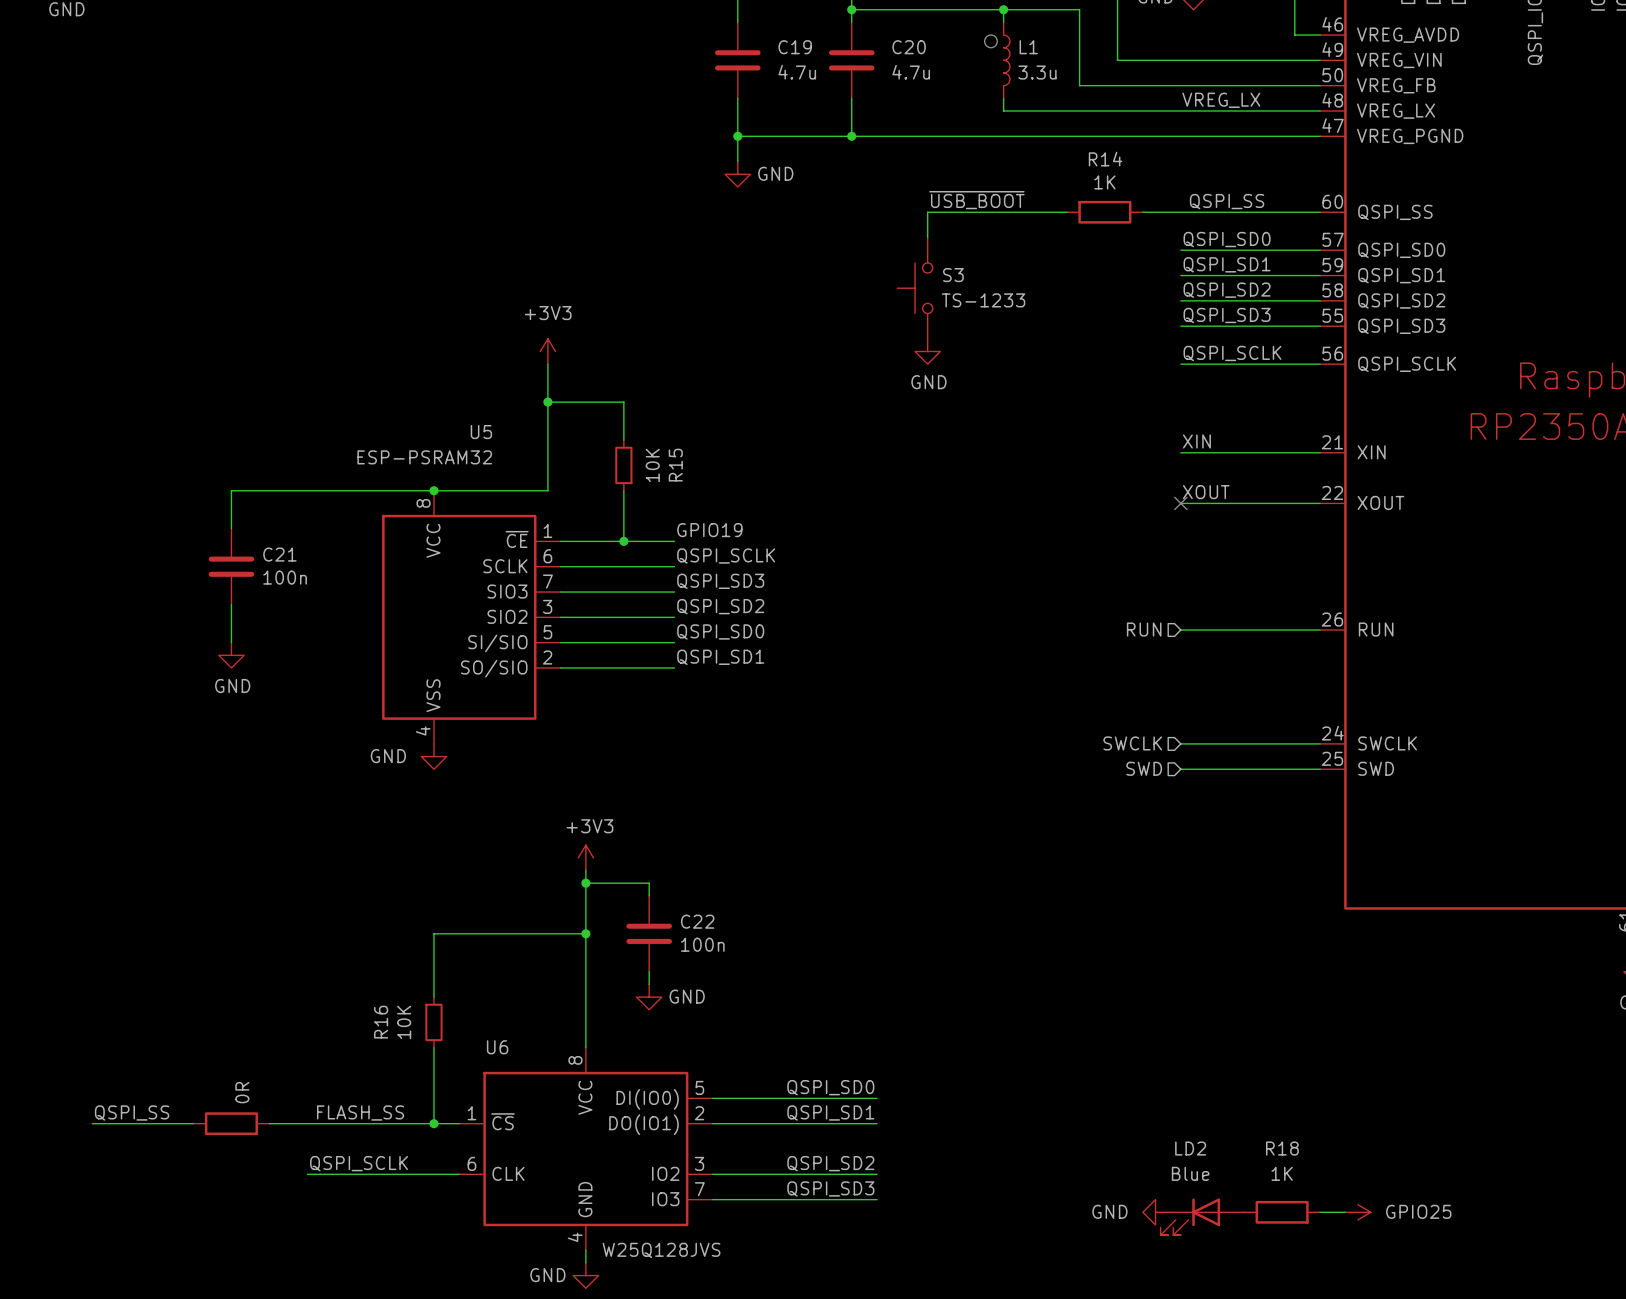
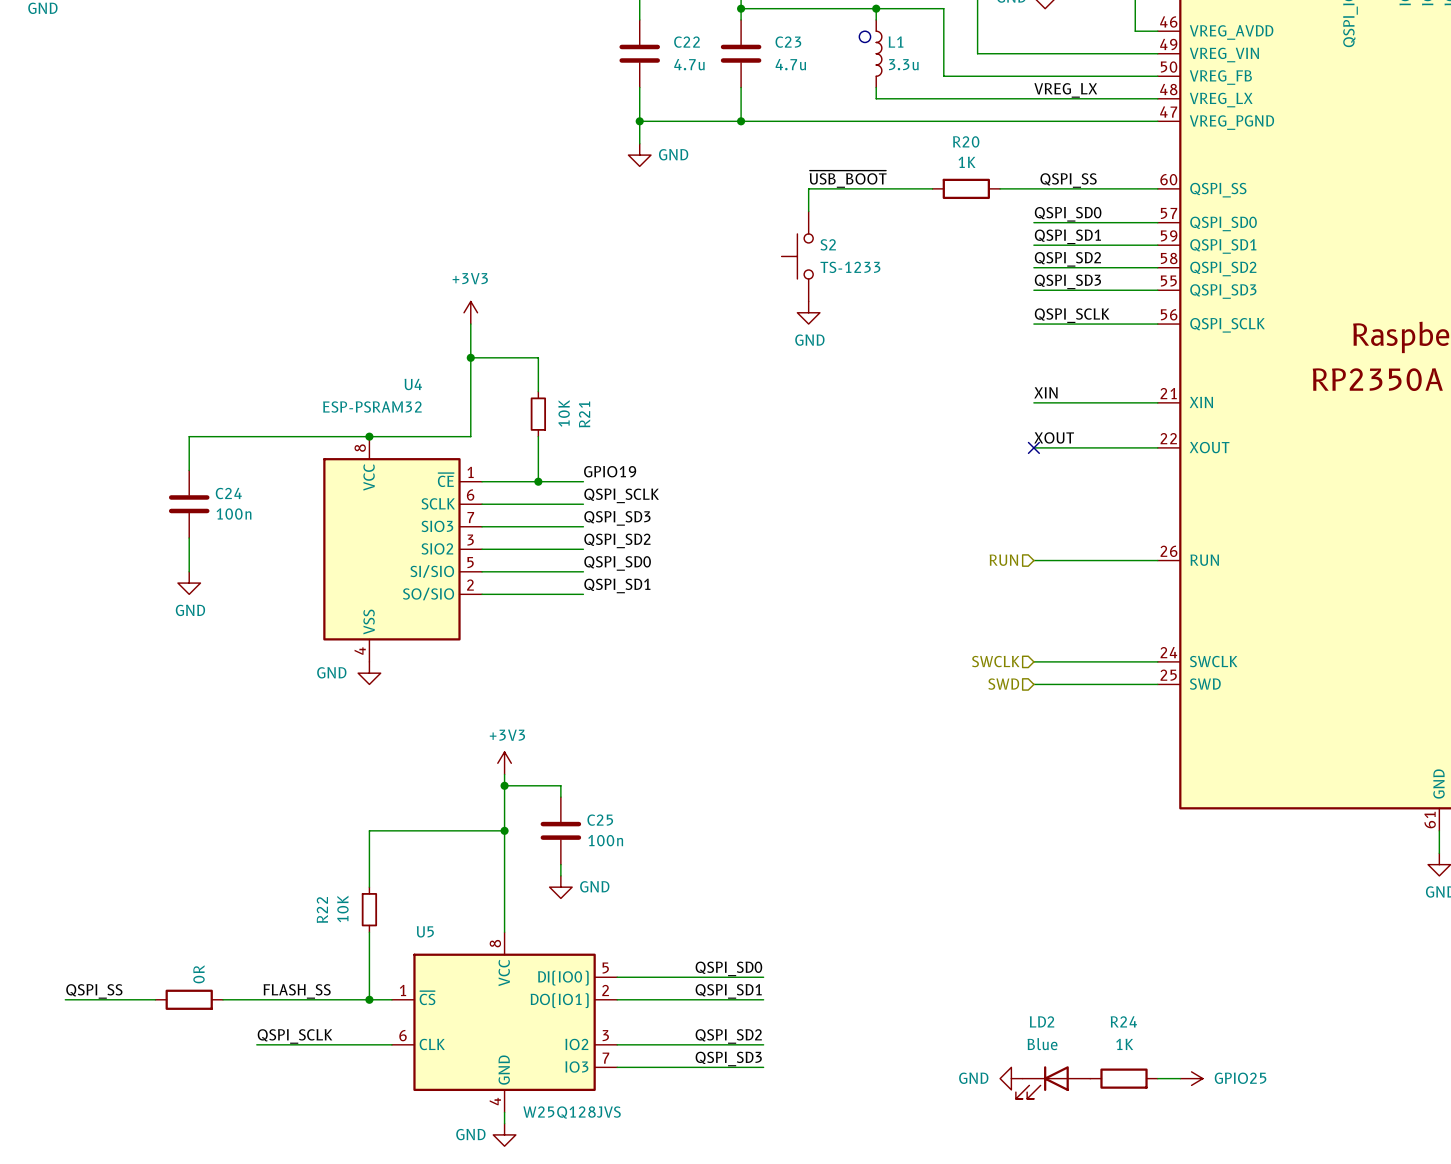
C19 name: C19 (795, 47) -> C22 (687, 42)
C20 name: C20 (909, 47) -> C23 (788, 42)
R14 name: R14 (1105, 159) -> R20 (966, 141)
S3 name: S3 (953, 275) -> S2 (828, 244)
U5 name: U5 (481, 432) -> U4 (413, 384)
R15 name: R15 (675, 465) -> R21 (584, 414)
C21 name: C21 (279, 554) -> C24 (228, 493)
C22 name: C22 (697, 921) -> C25 (600, 820)
R16 name: R16 (381, 1022) -> R22 (322, 910)
U6 name: U6 (497, 1047) -> U5 (425, 931)
R18 name: R18 (1282, 1148) -> R24 (1123, 1021)

